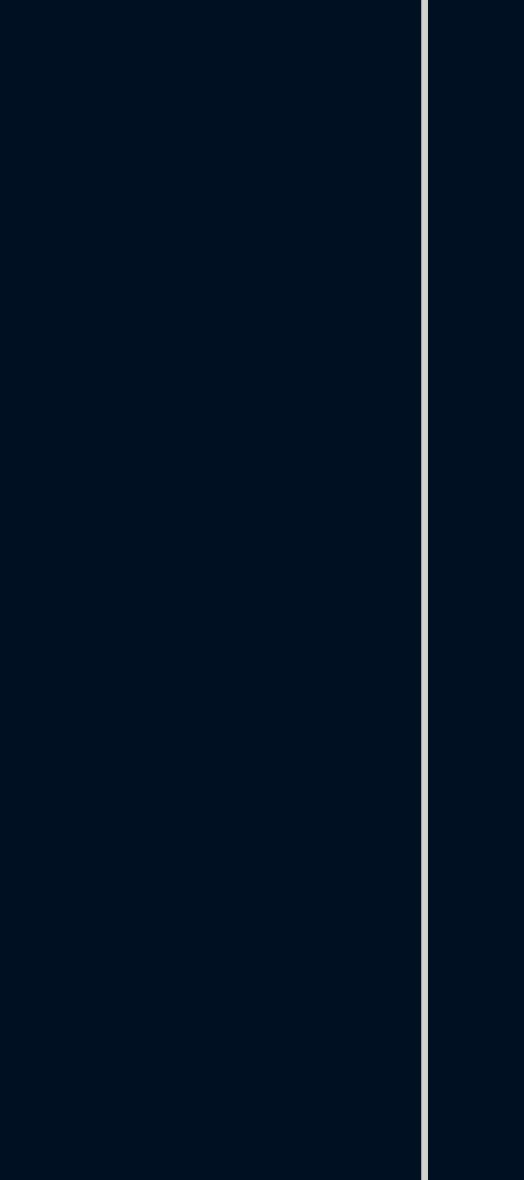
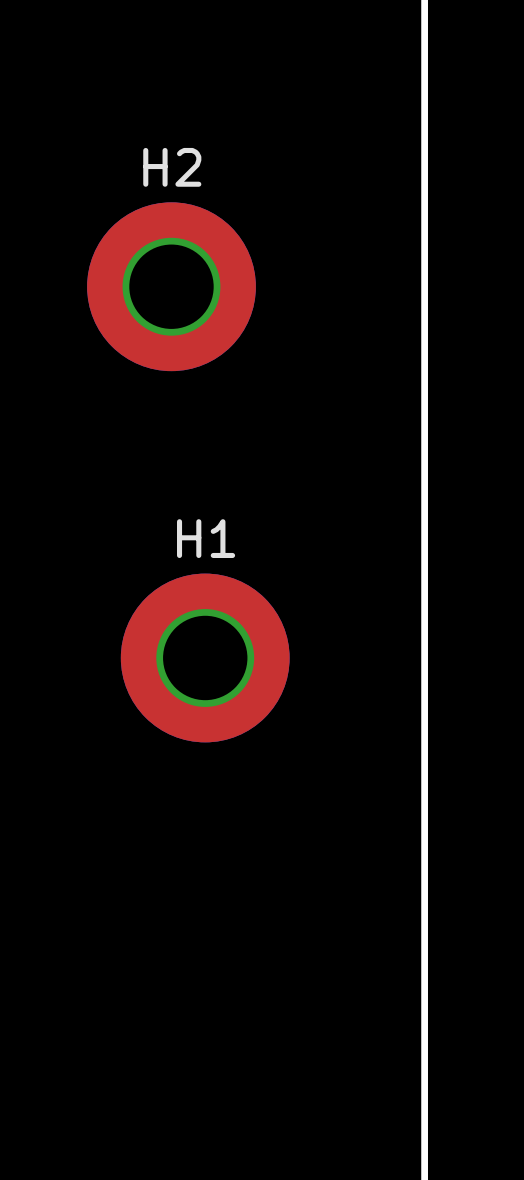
H2: none -> (171, 286)
H1: none -> (205, 657)

